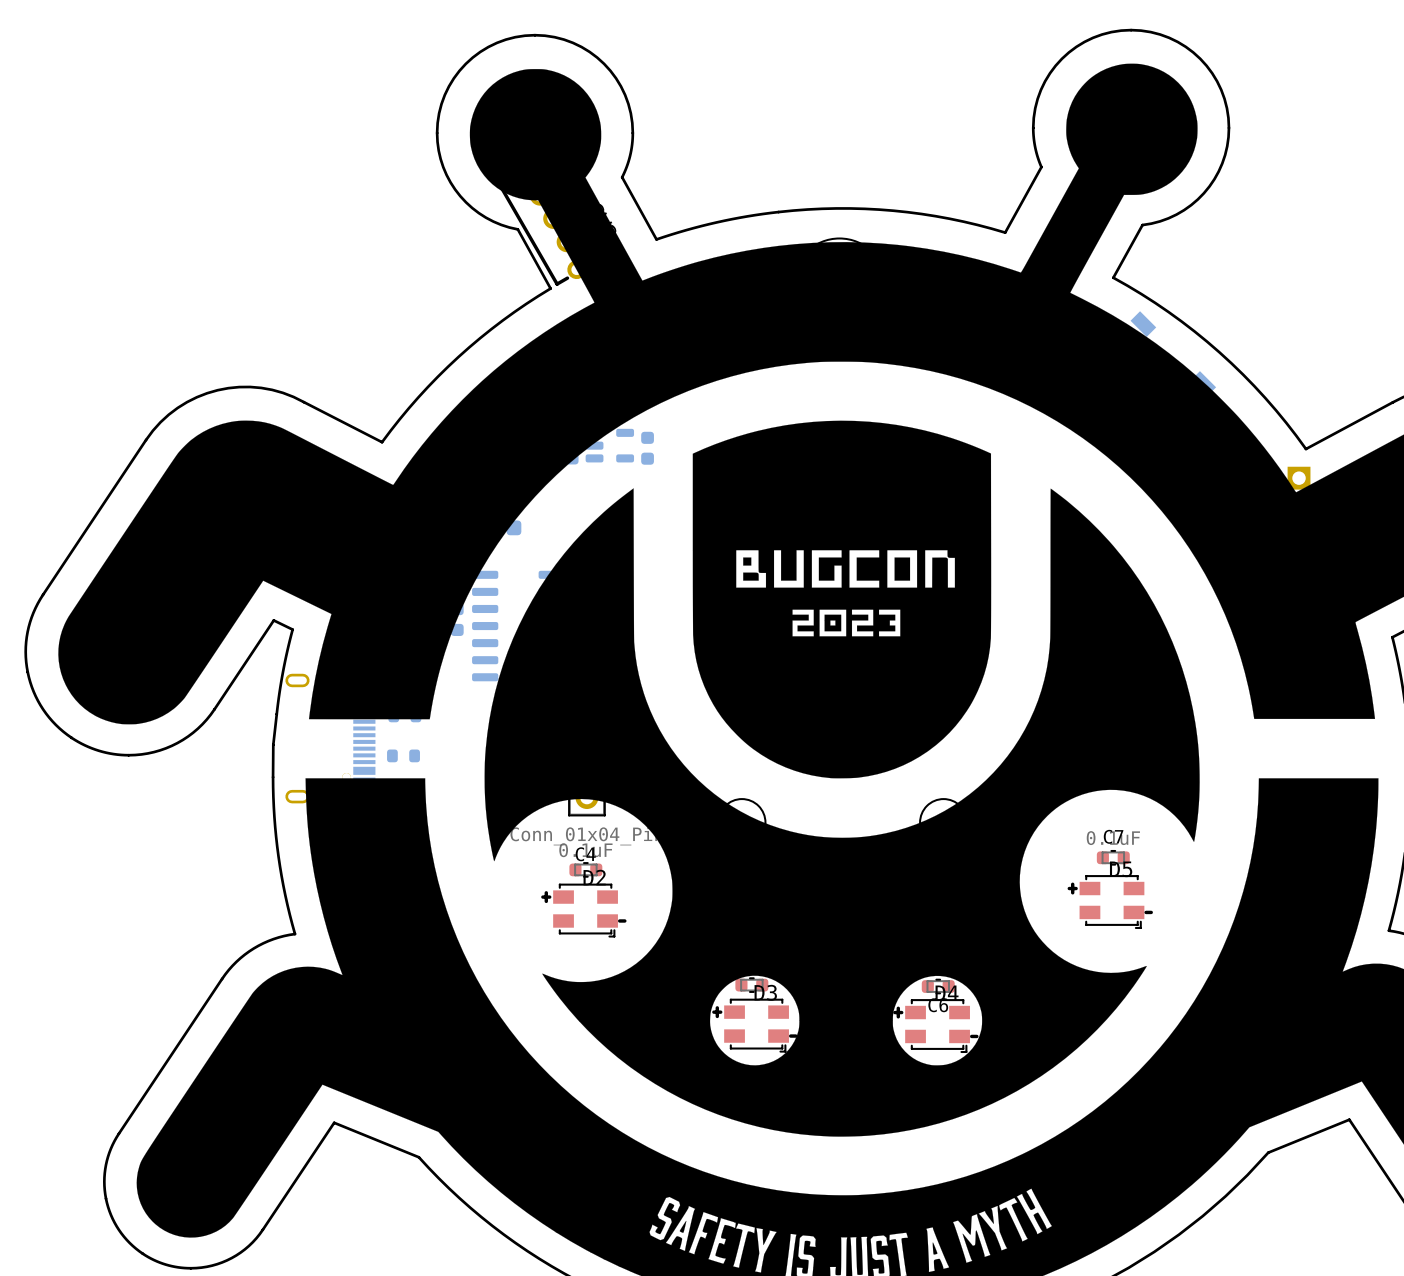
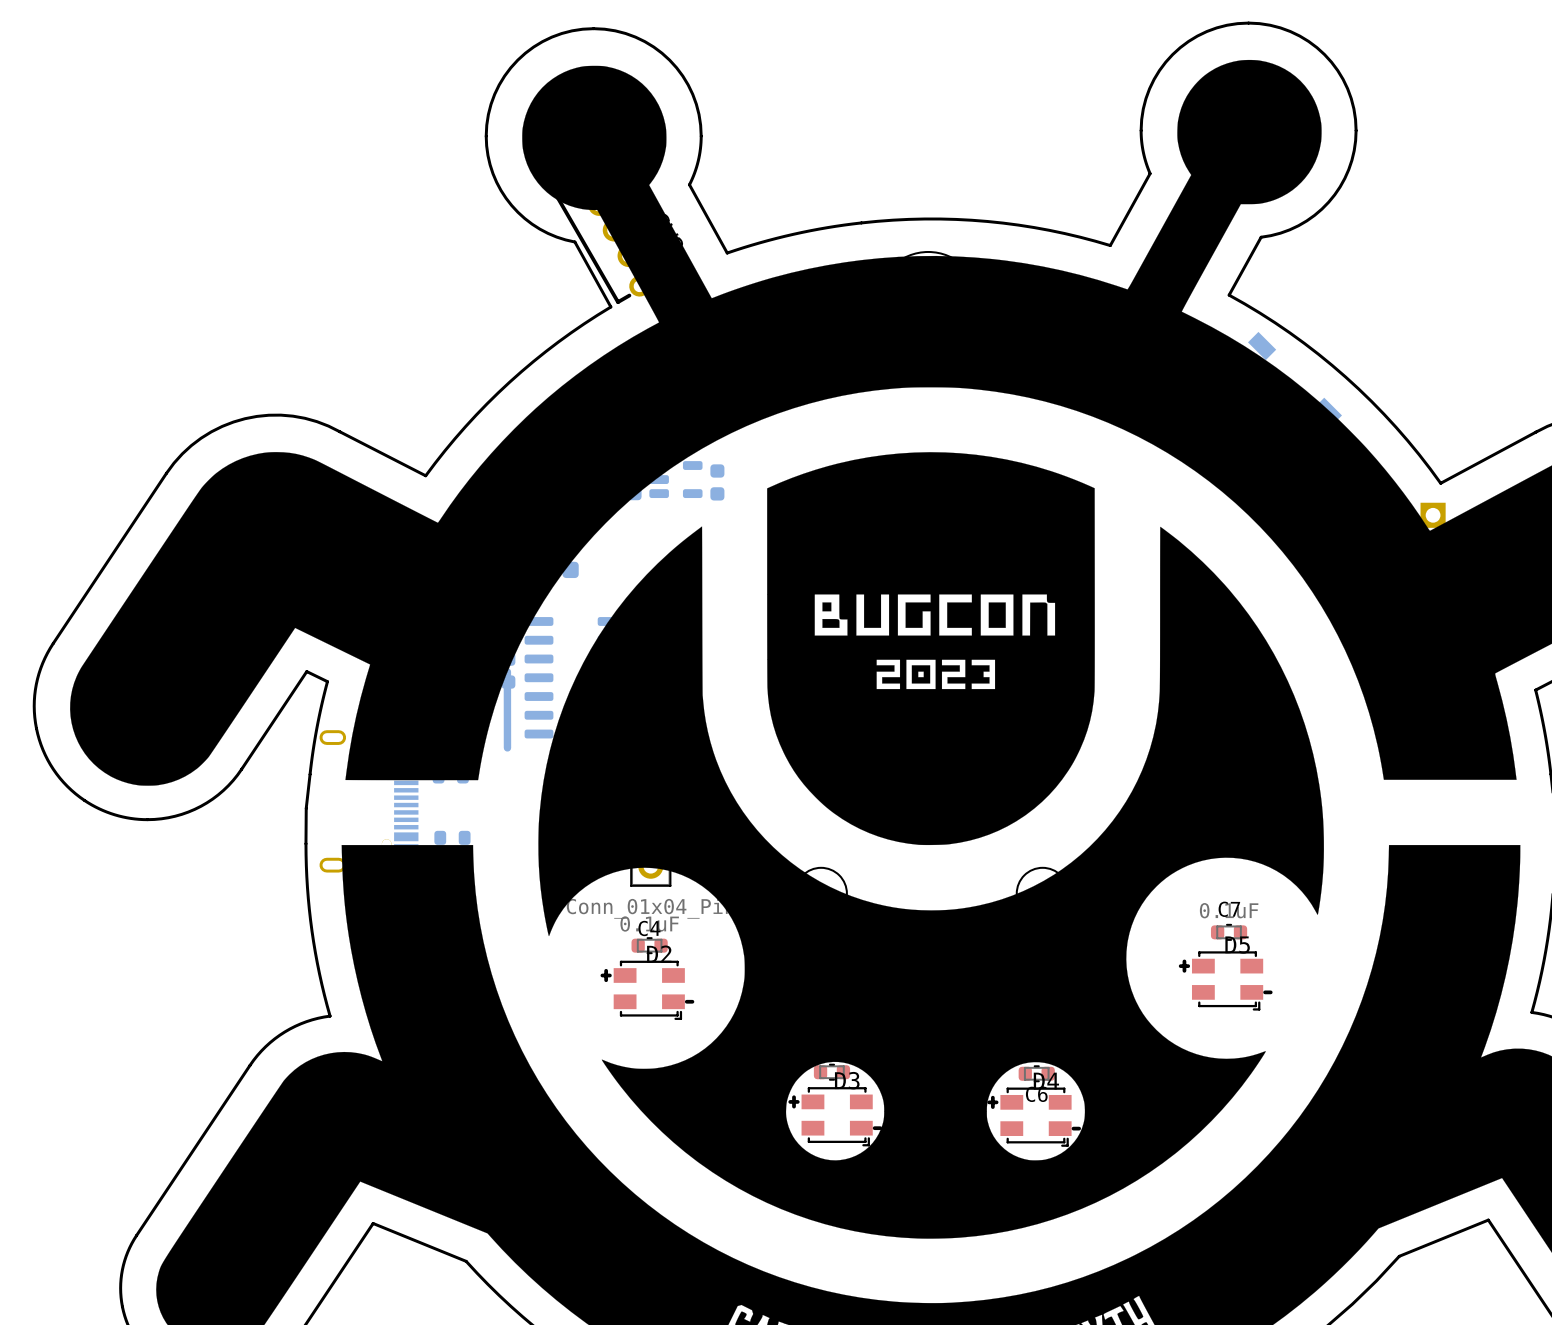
bottom track: none -> (507, 671) (507, 747)
part position: (403, 755) -> (452, 837)

